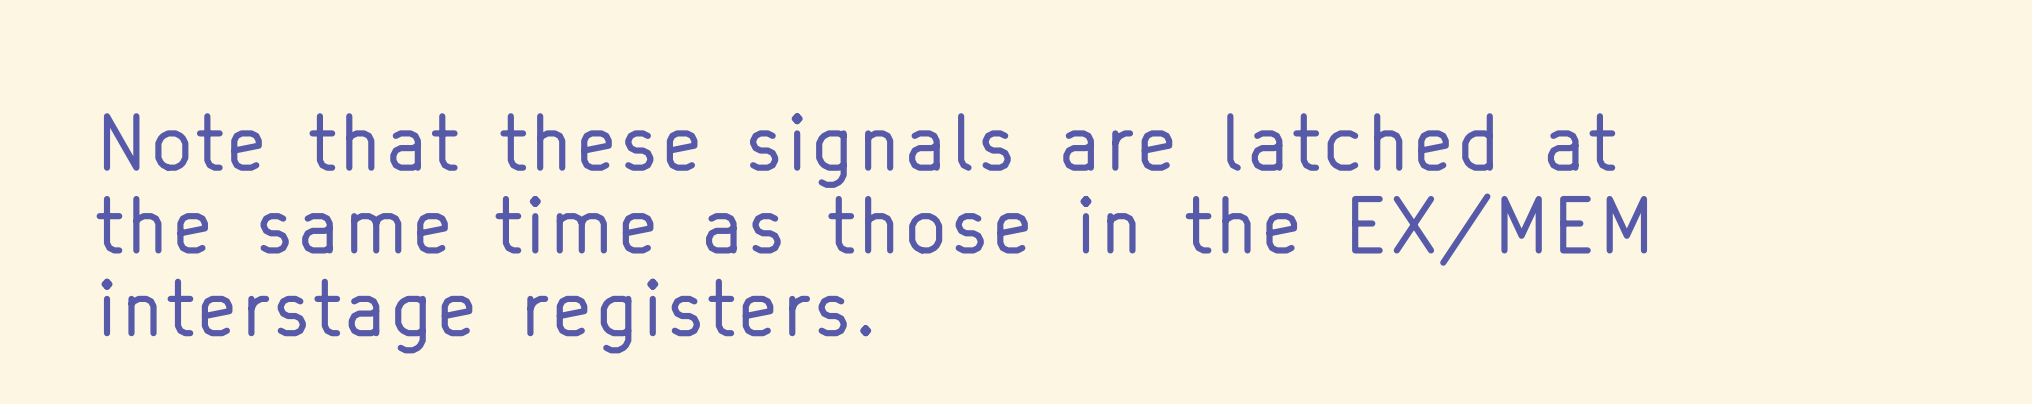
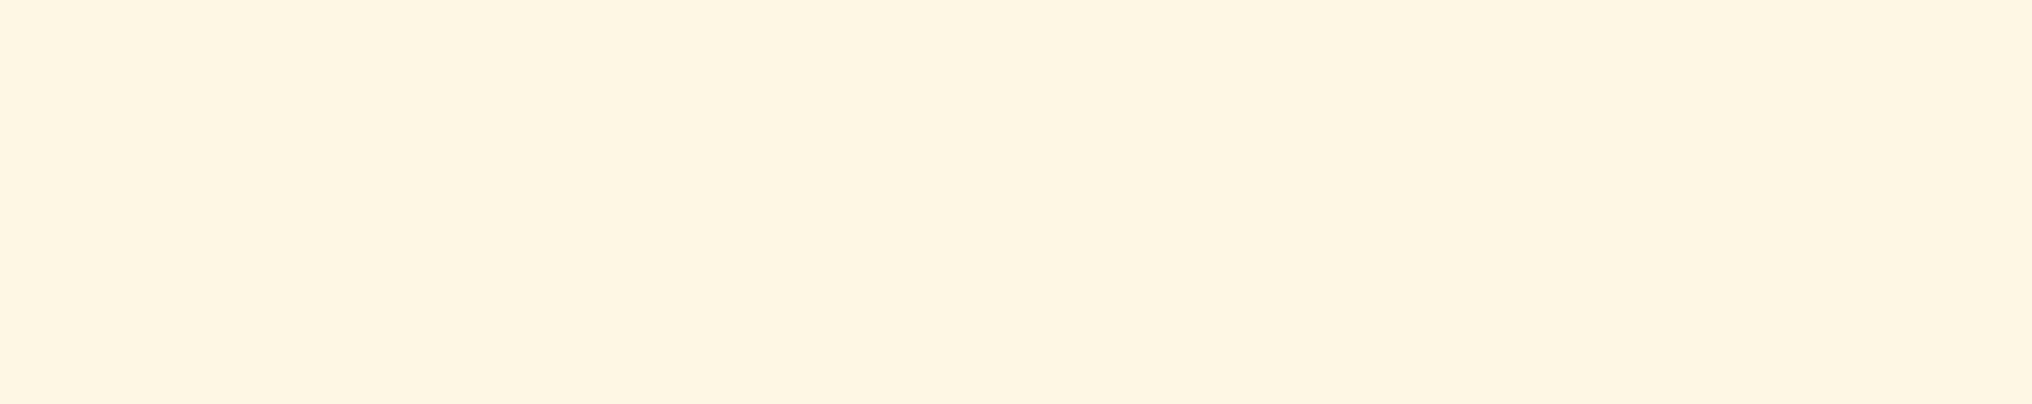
text: Note that these signals are latched at (859, 150) -> none
text: the same time as those in the EX/MEM (871, 229) -> none
text: interstage registers. (486, 316) -> none

